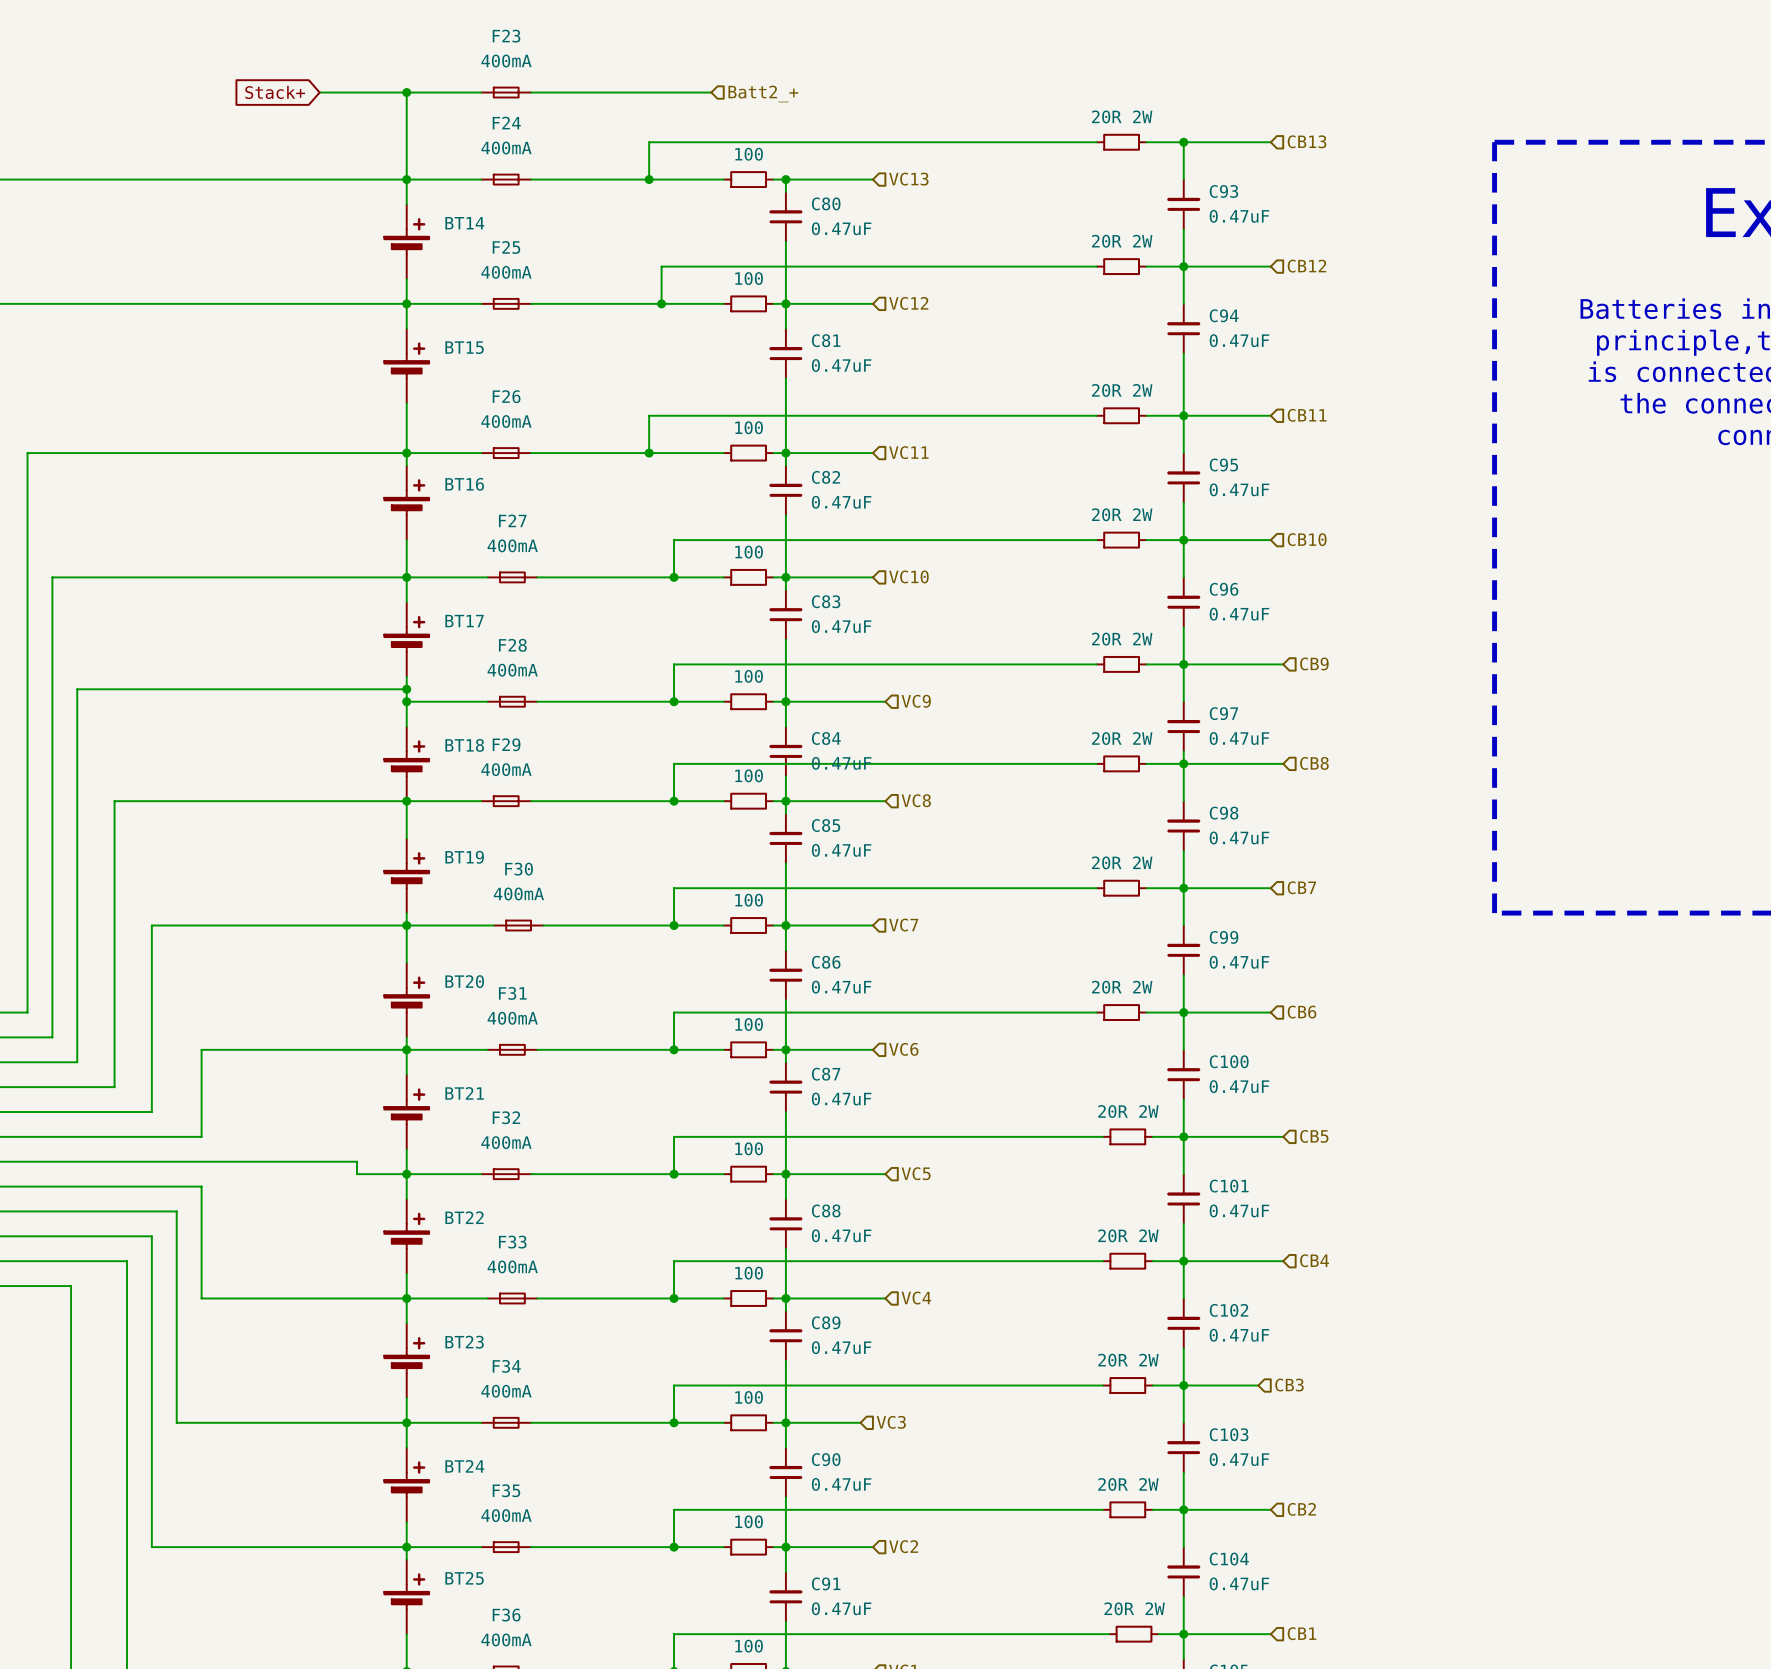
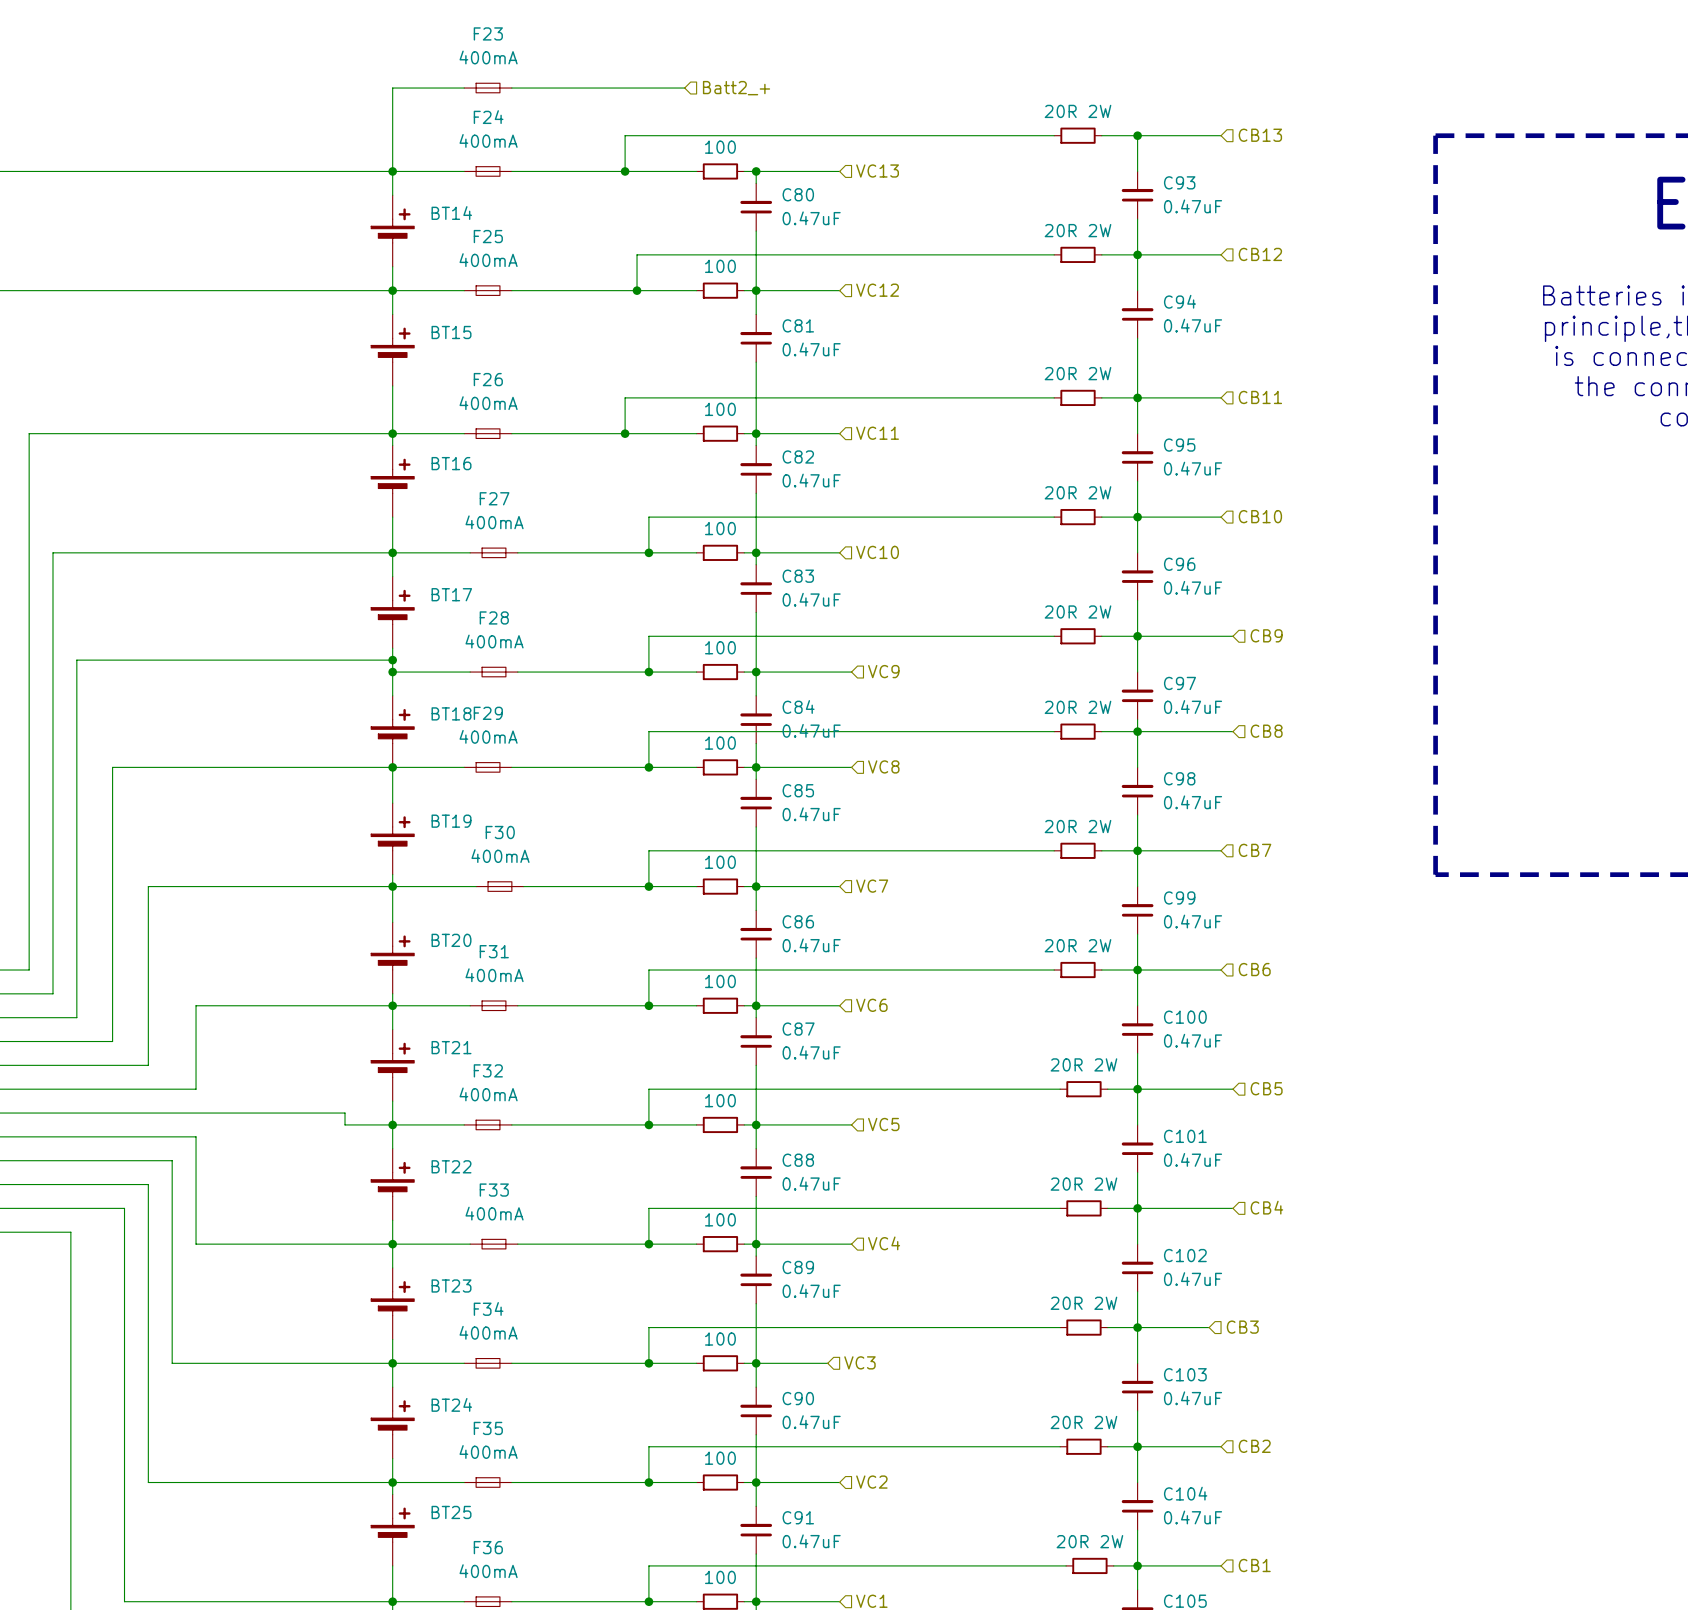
global label: Stack+ (275, 92) -> none
wire: (319, 92) (406, 92) -> none
junction: (406, 92) -> none

